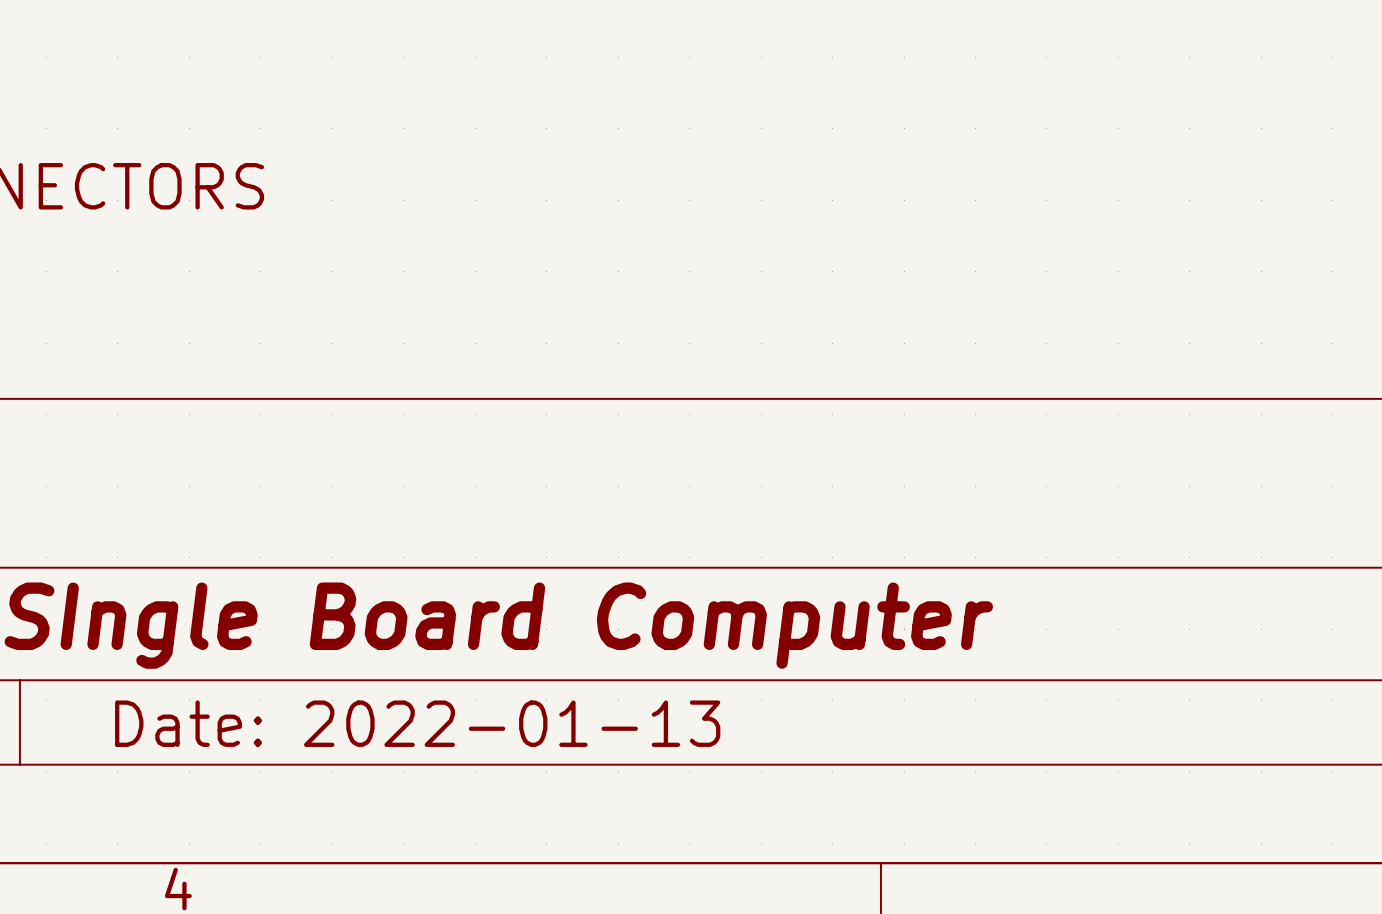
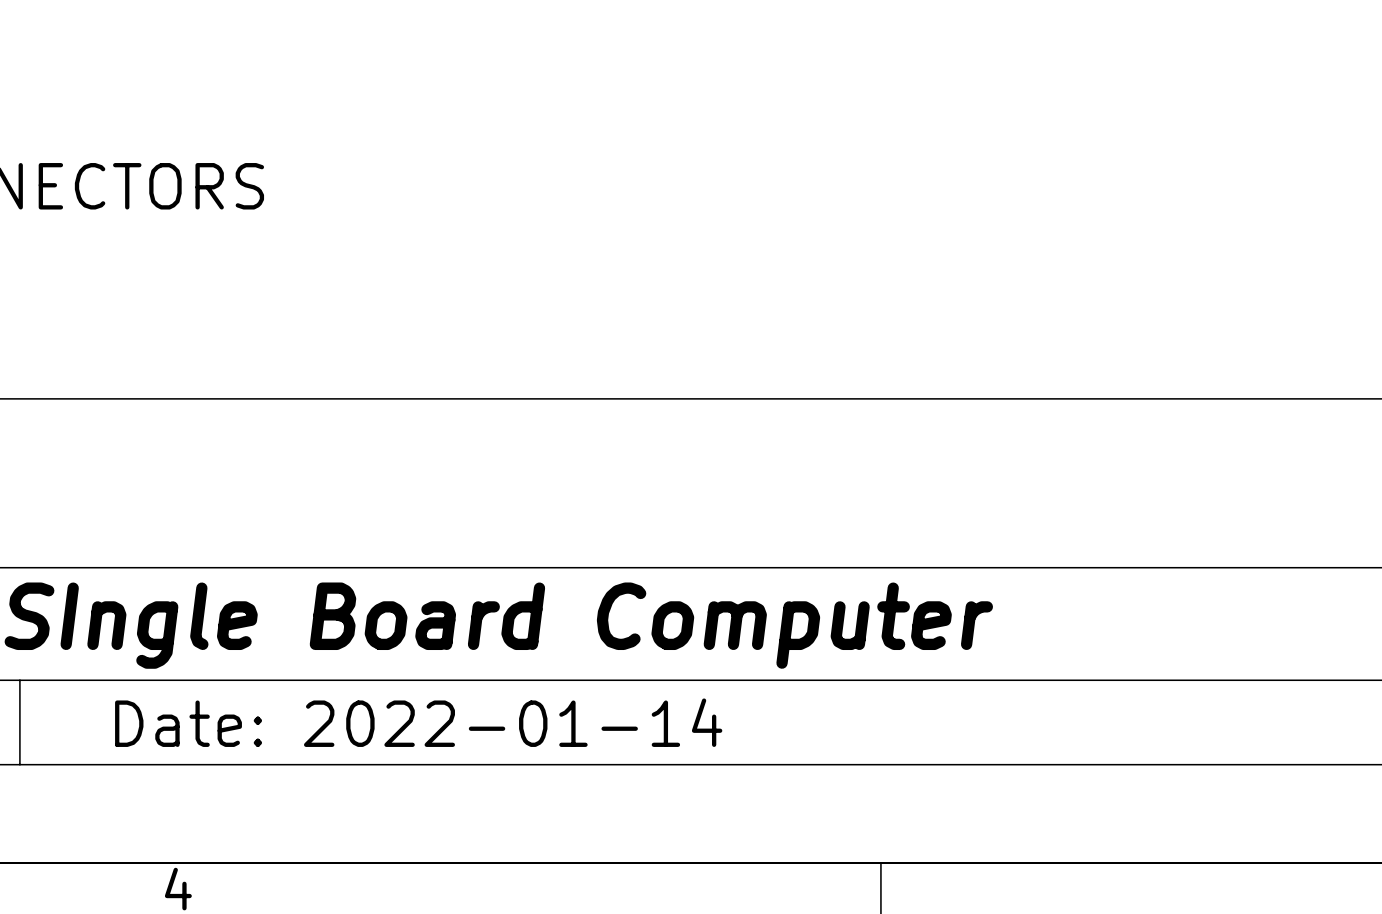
title block: Date: 2022-01-13 (417, 723) -> Date: 2022-01-14 (418, 722)

